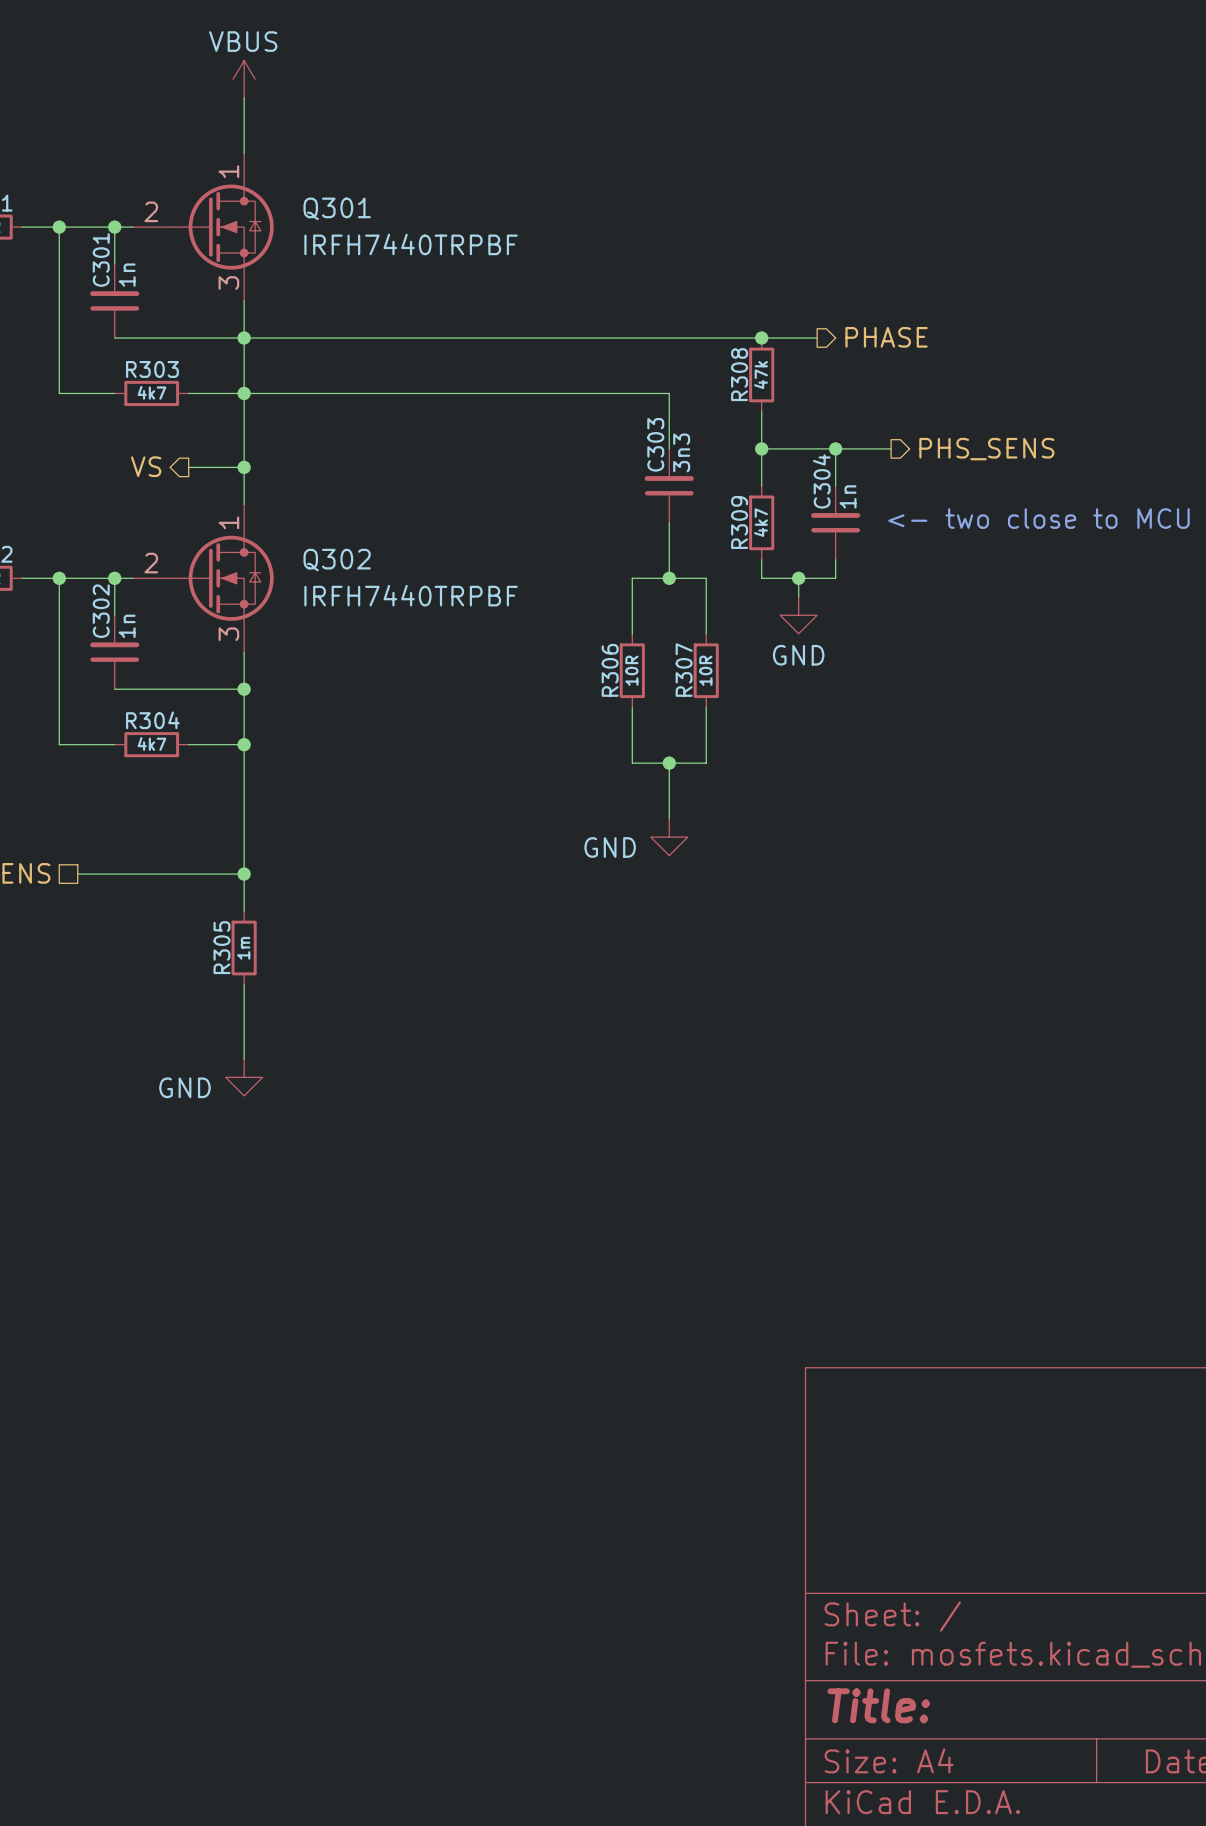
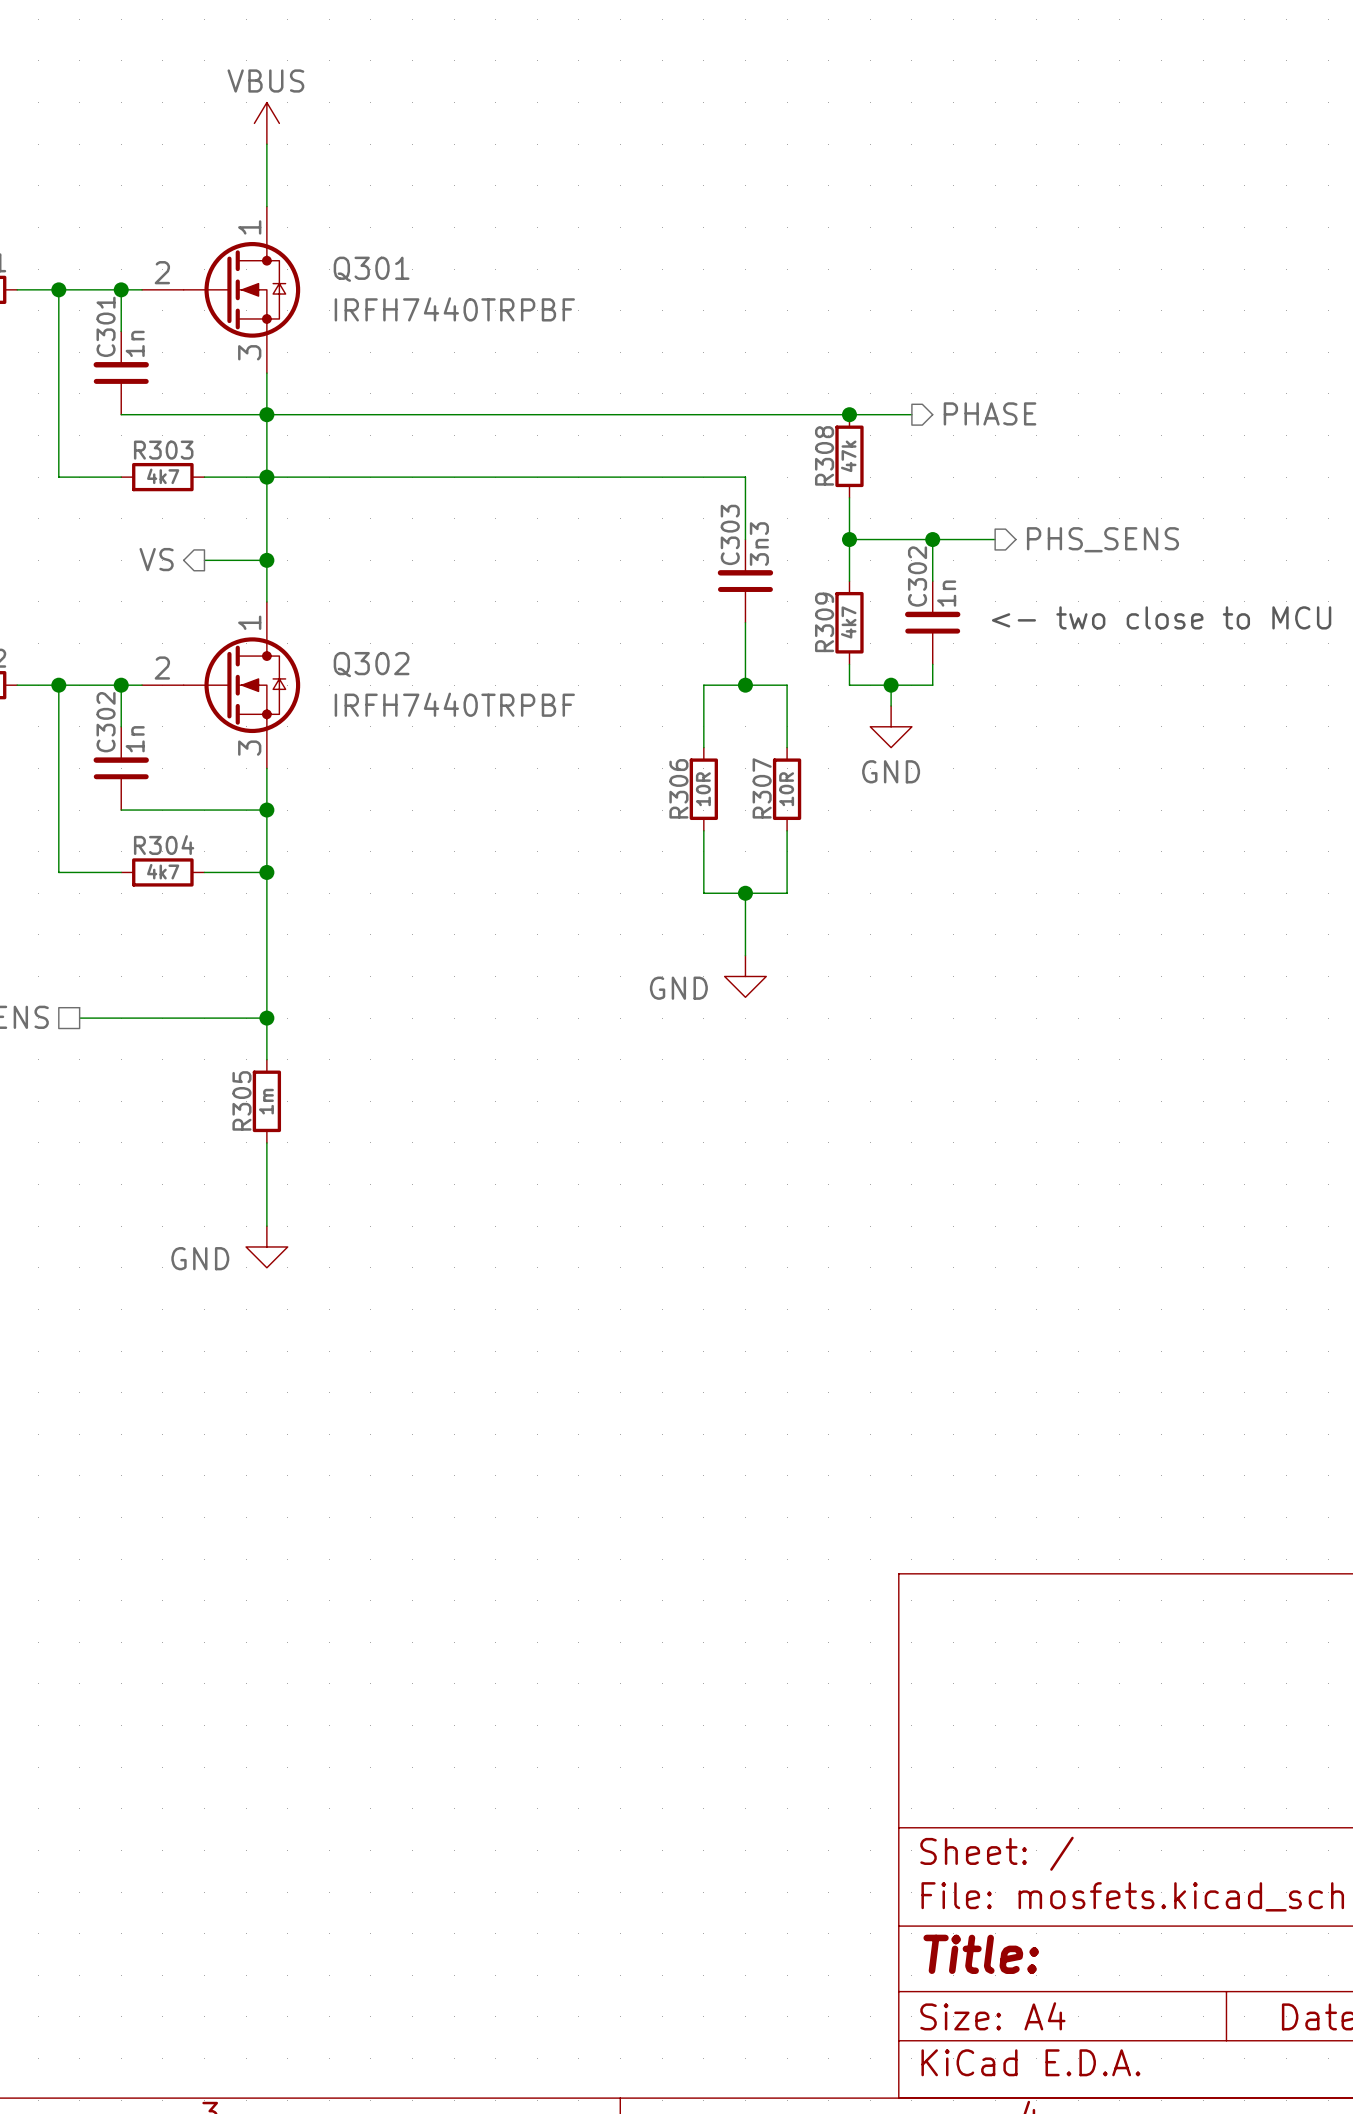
C304 name: C304 (821, 481) -> C302 (917, 576)

